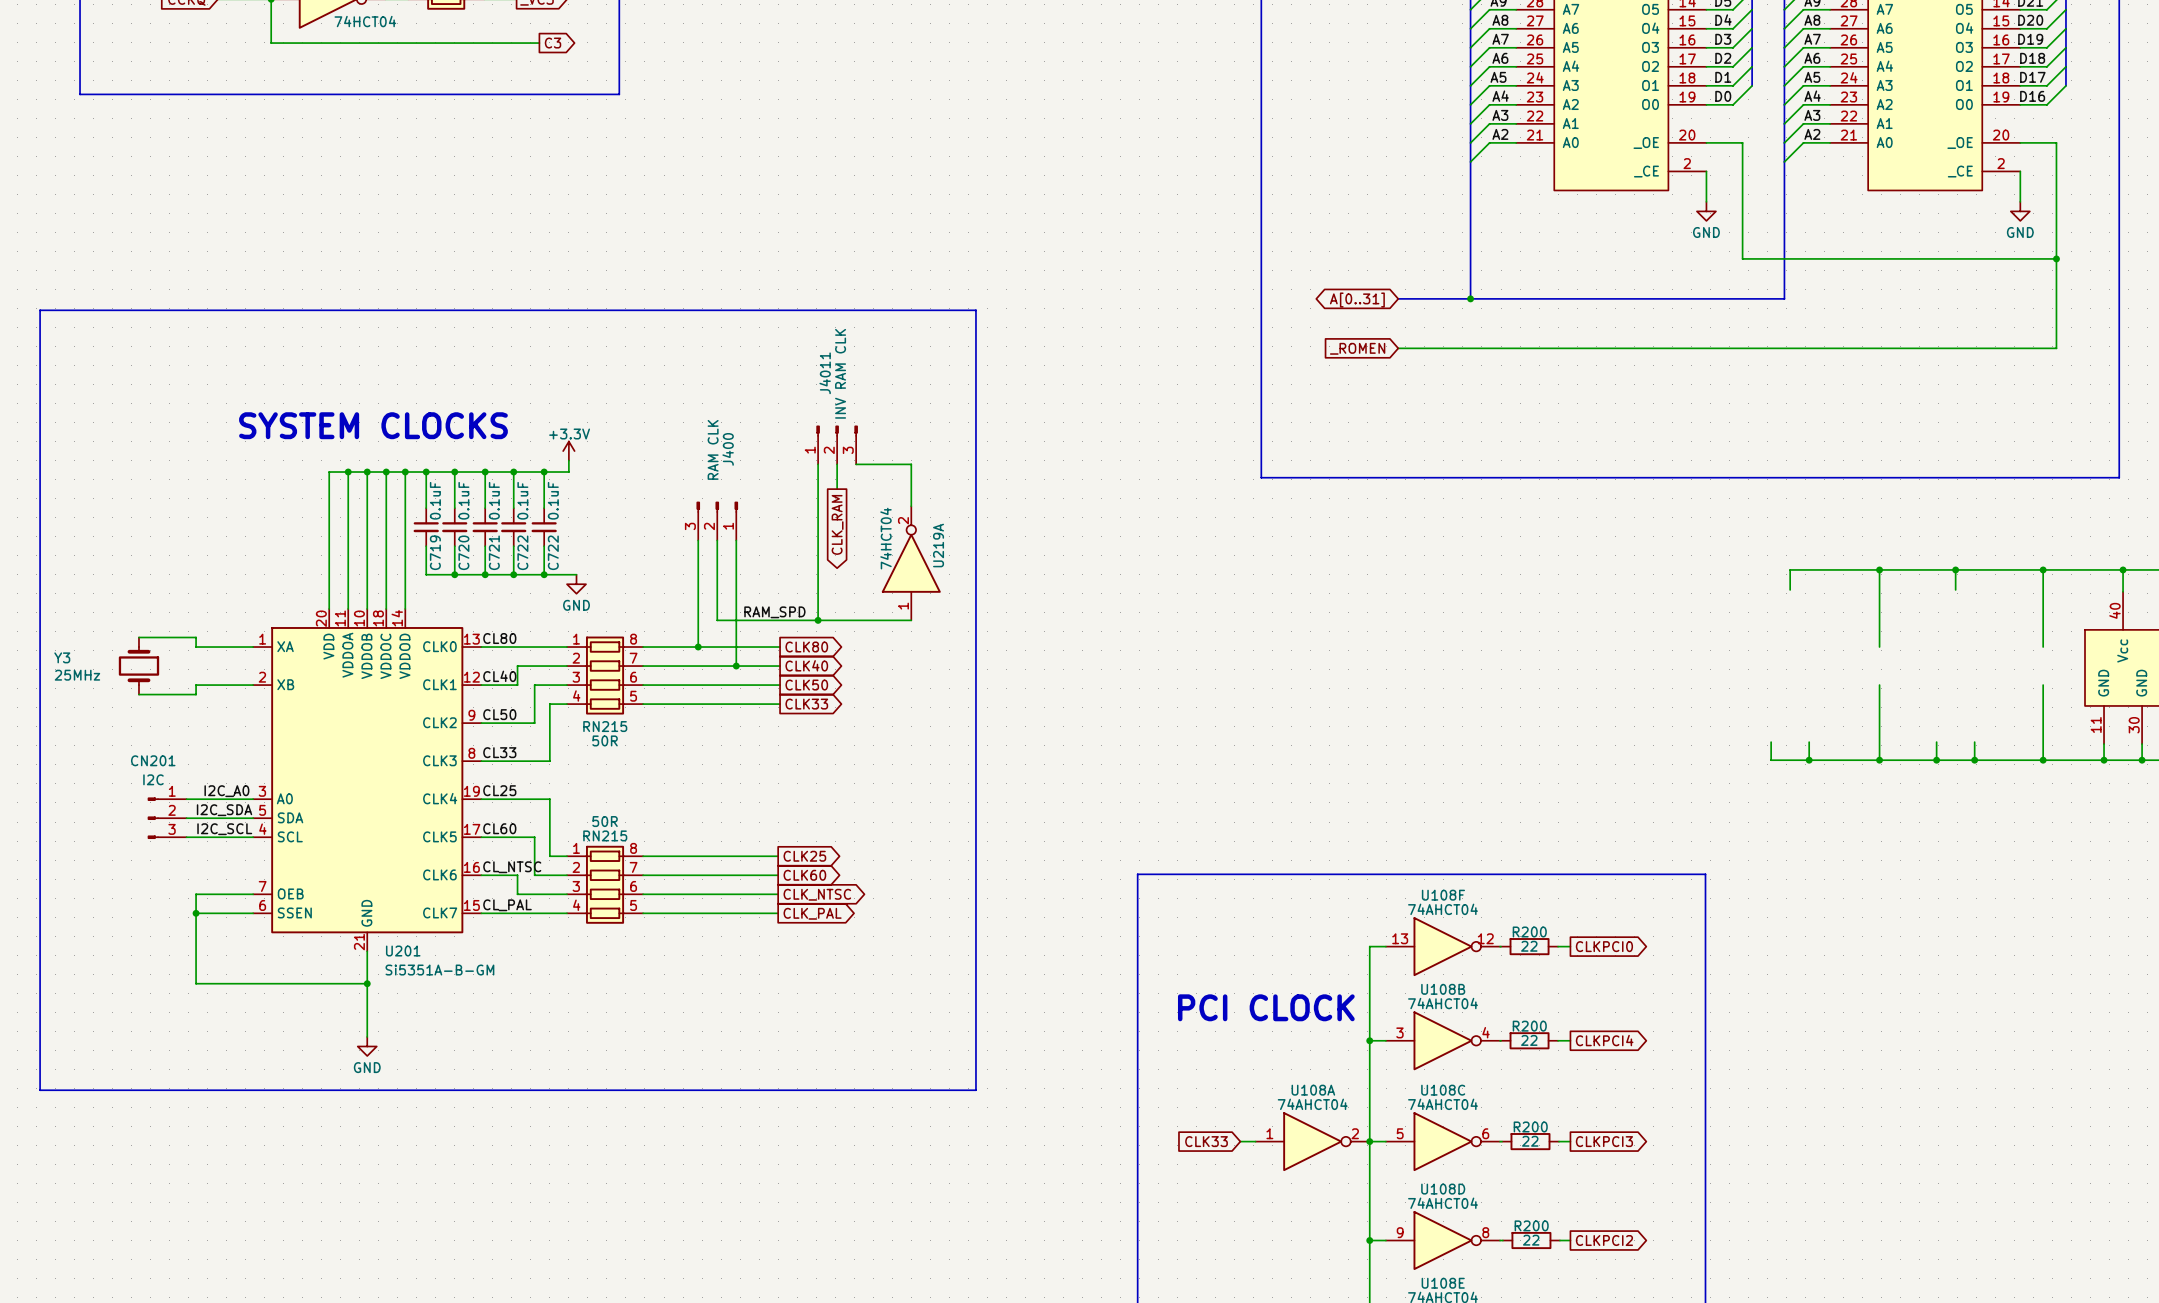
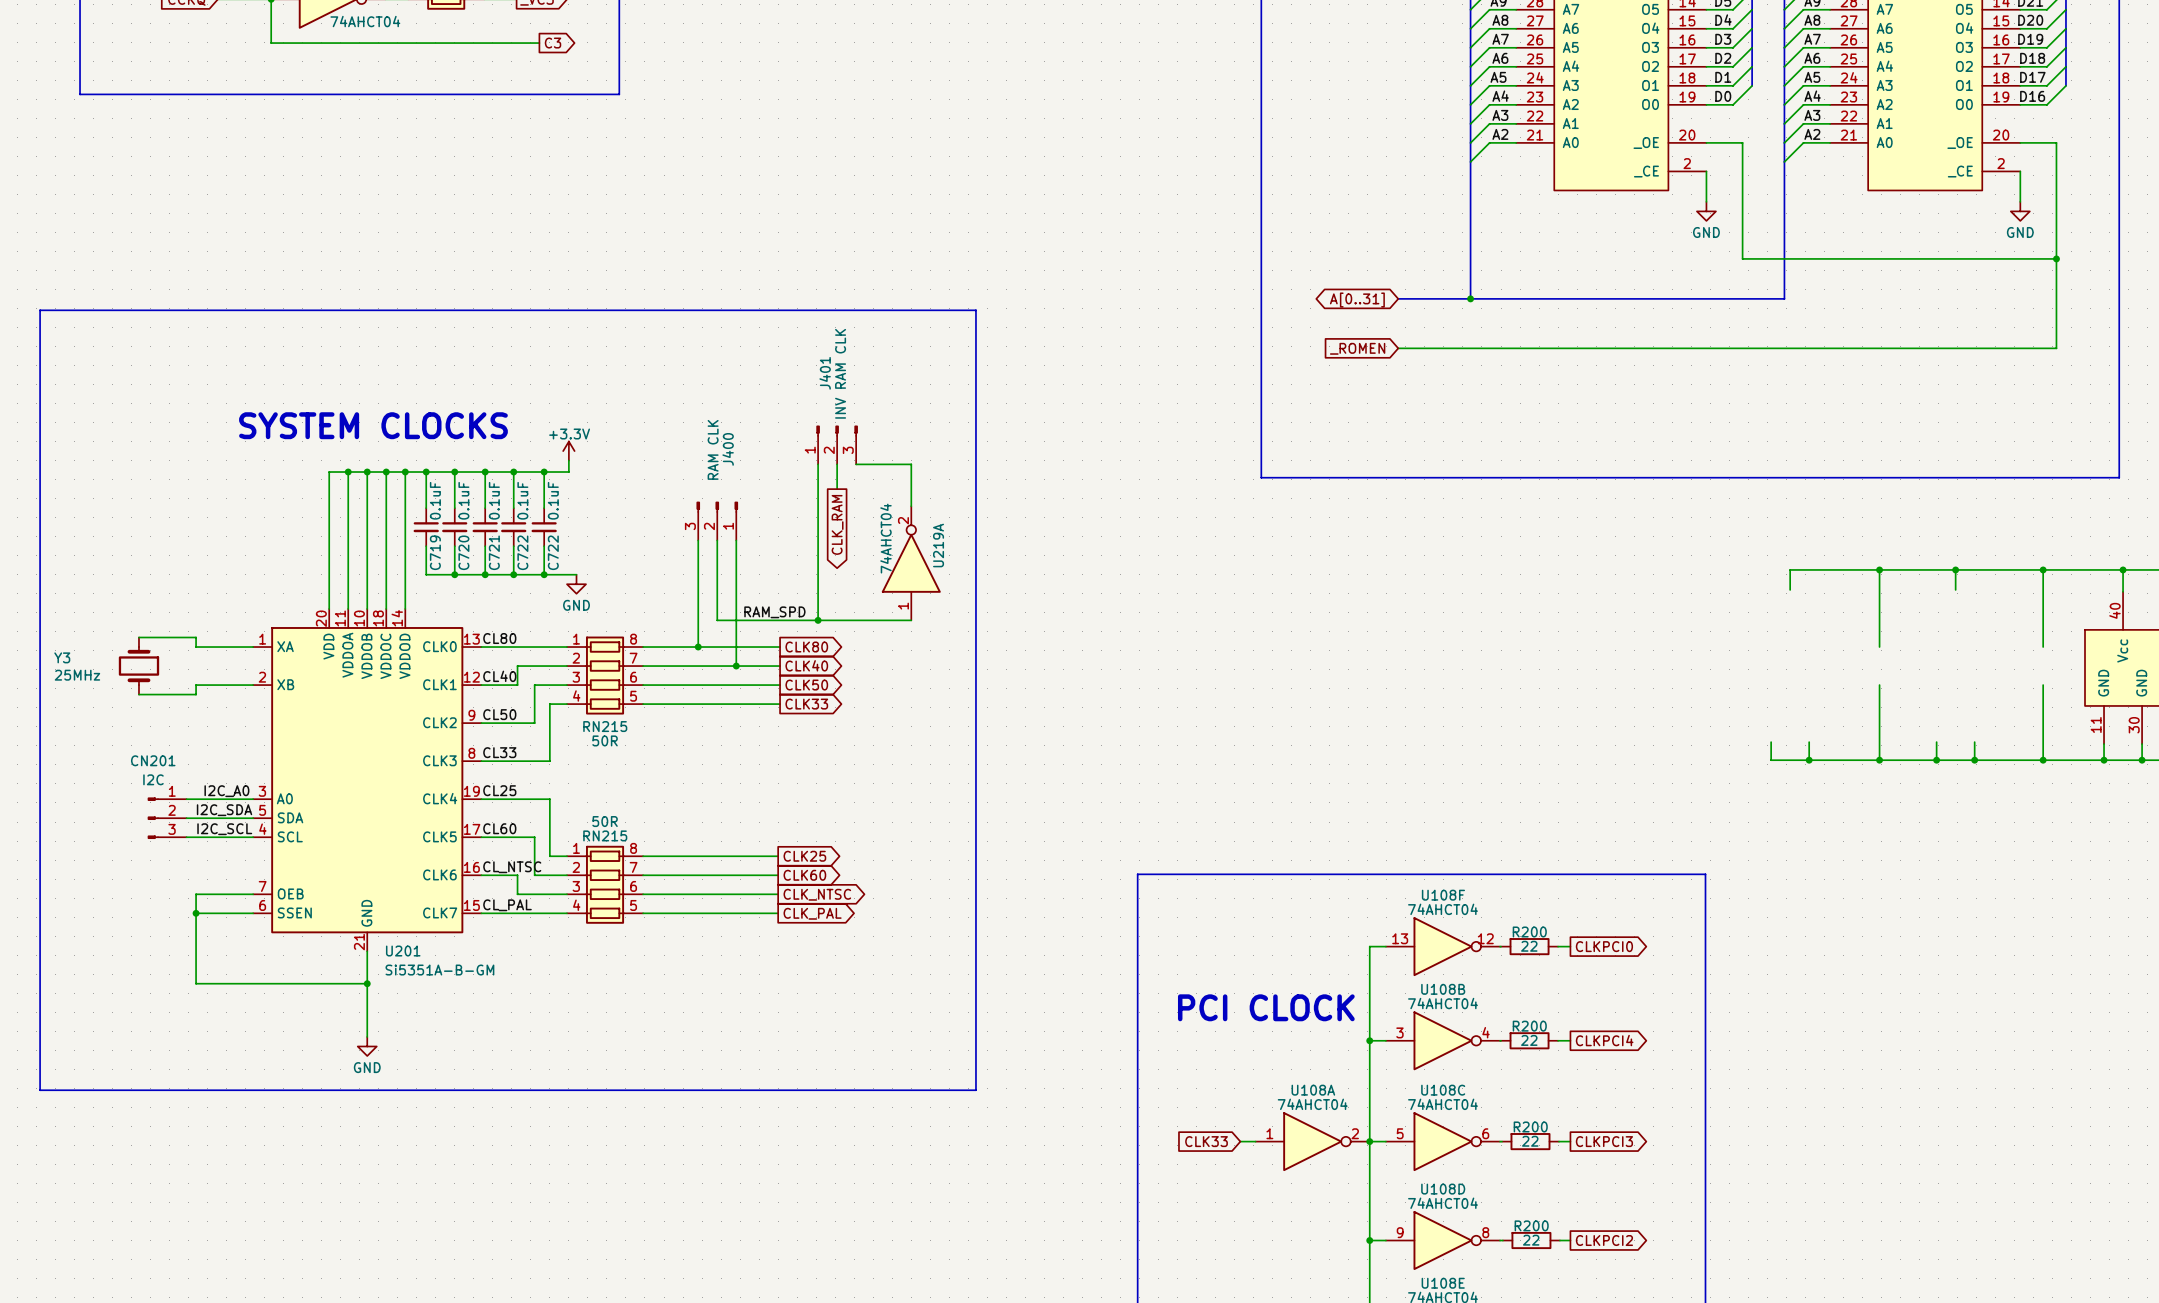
part value: 74HCT04 (365, 21) -> 74AHCT04 (365, 21)
J4011 name: J4011 (825, 373) -> J401 (825, 373)
U219A value: 74HCT04 (885, 538) -> 74AHCT04 (885, 538)

